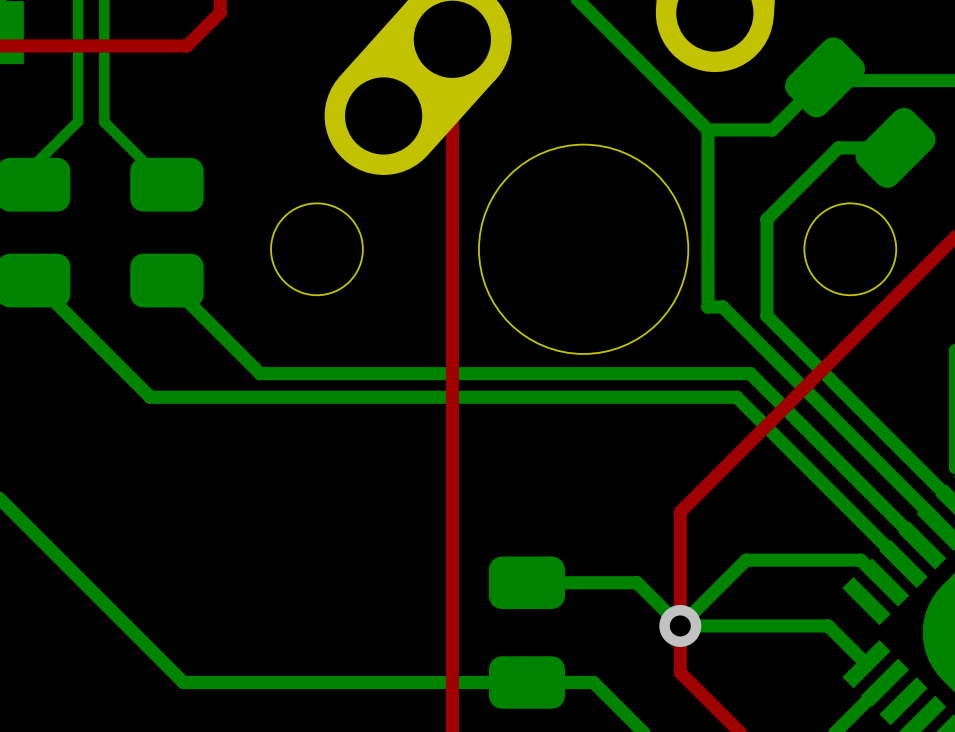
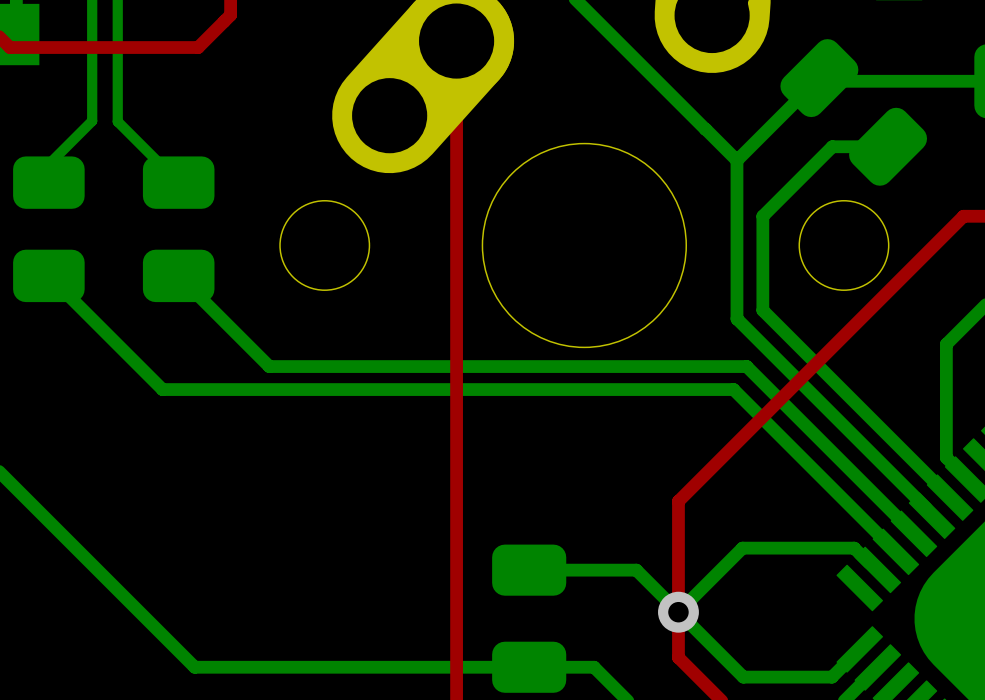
bottom track: none -> (705, 129) (736, 160)
bottom track: (772, 129) (708, 129) (707, 306) (722, 306) (740, 324) -> (736, 160) (736, 318)
bottom track: none -> (768, 129) (736, 160)
bottom track: (680, 625) (828, 625) (866, 664) -> (678, 612) (743, 677) (832, 677) (859, 649)

